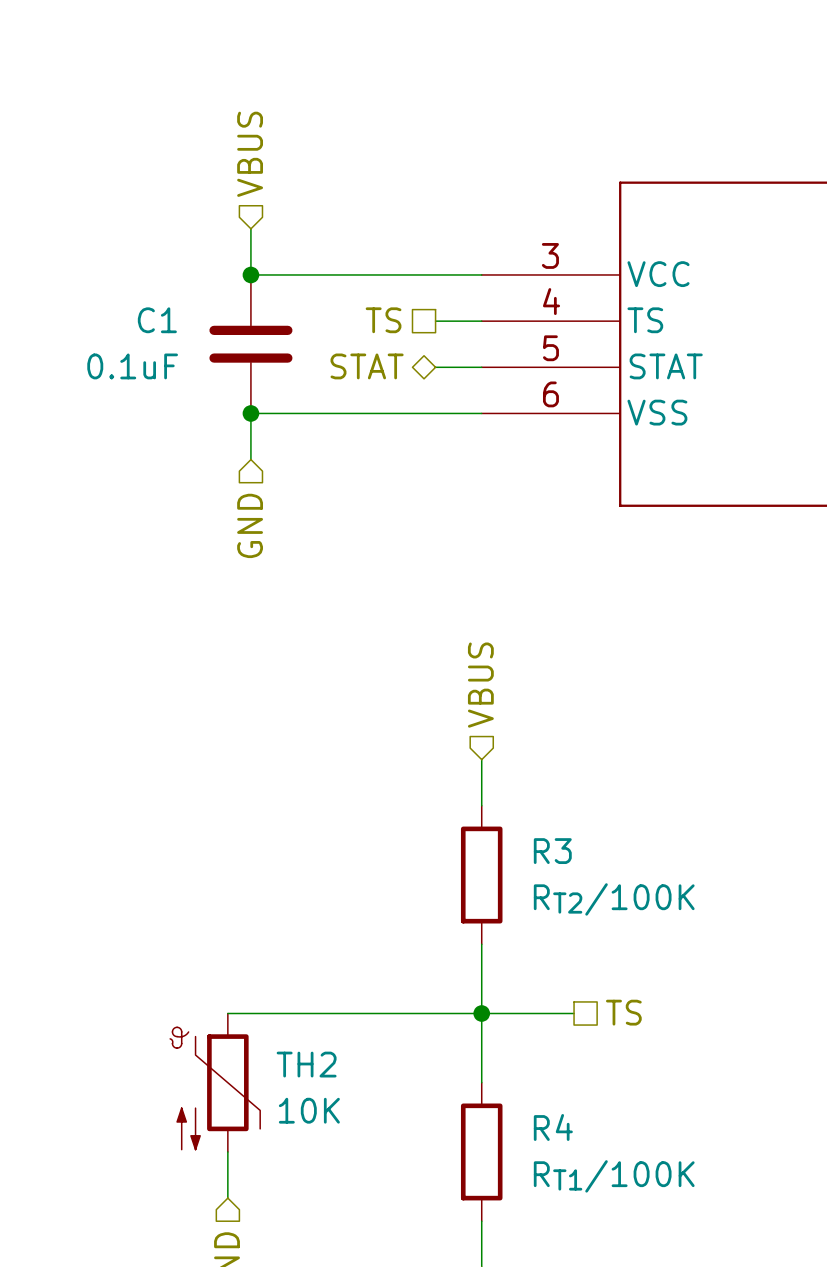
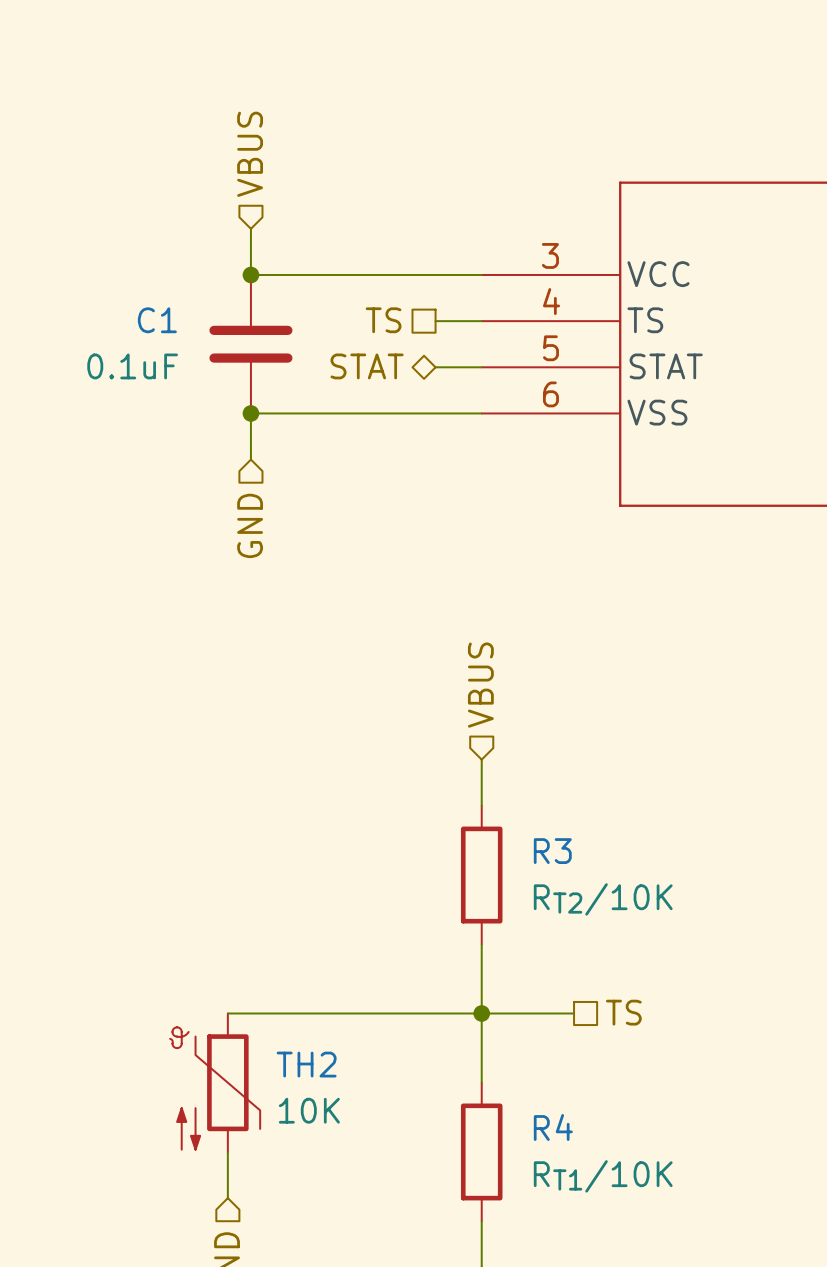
R3 value: RT2/100K (614, 899) -> RT2/10K (603, 899)
R4 value: RT1/100K (614, 1176) -> RT1/10K (603, 1176)

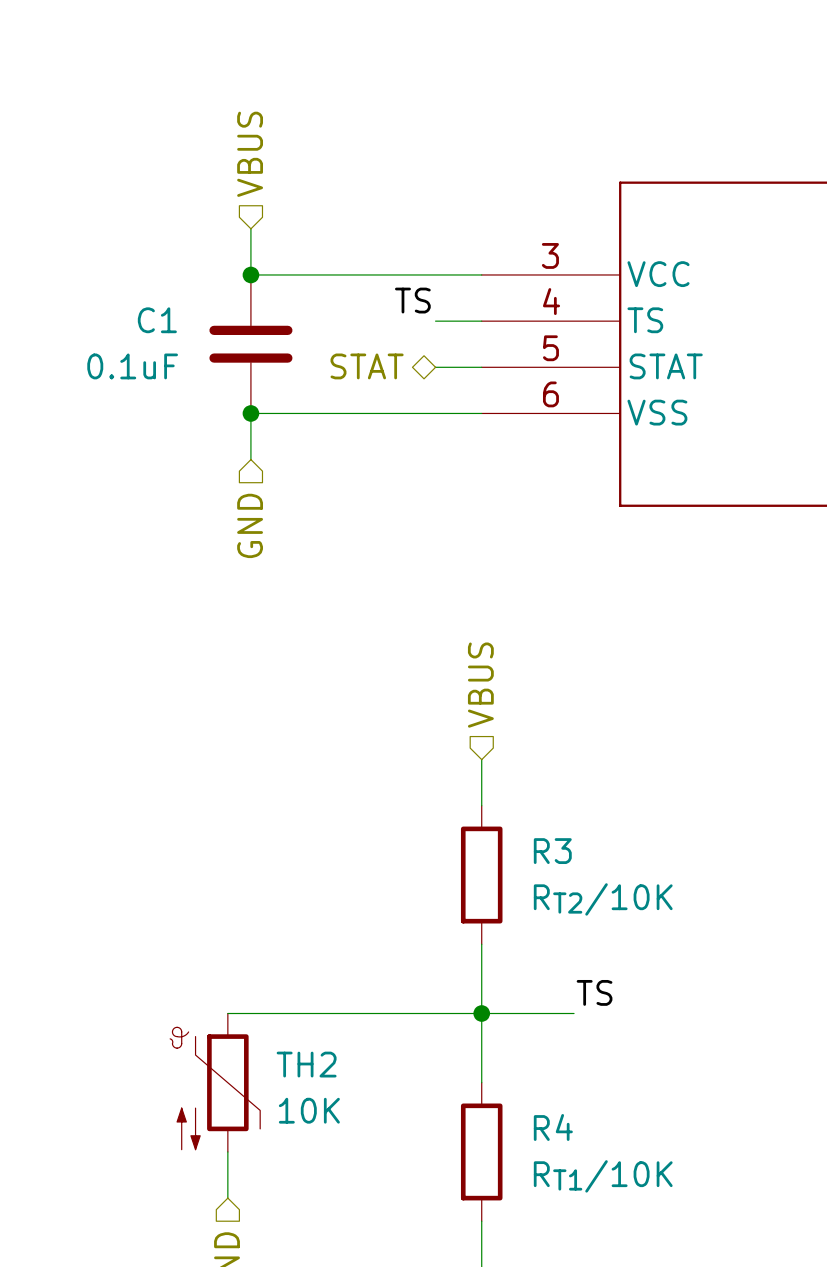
label: none -> TS (412, 300)
hierarchical label: TS (383, 320) -> none
label: none -> TS (594, 992)
hierarchical label: TS (623, 1012) -> none

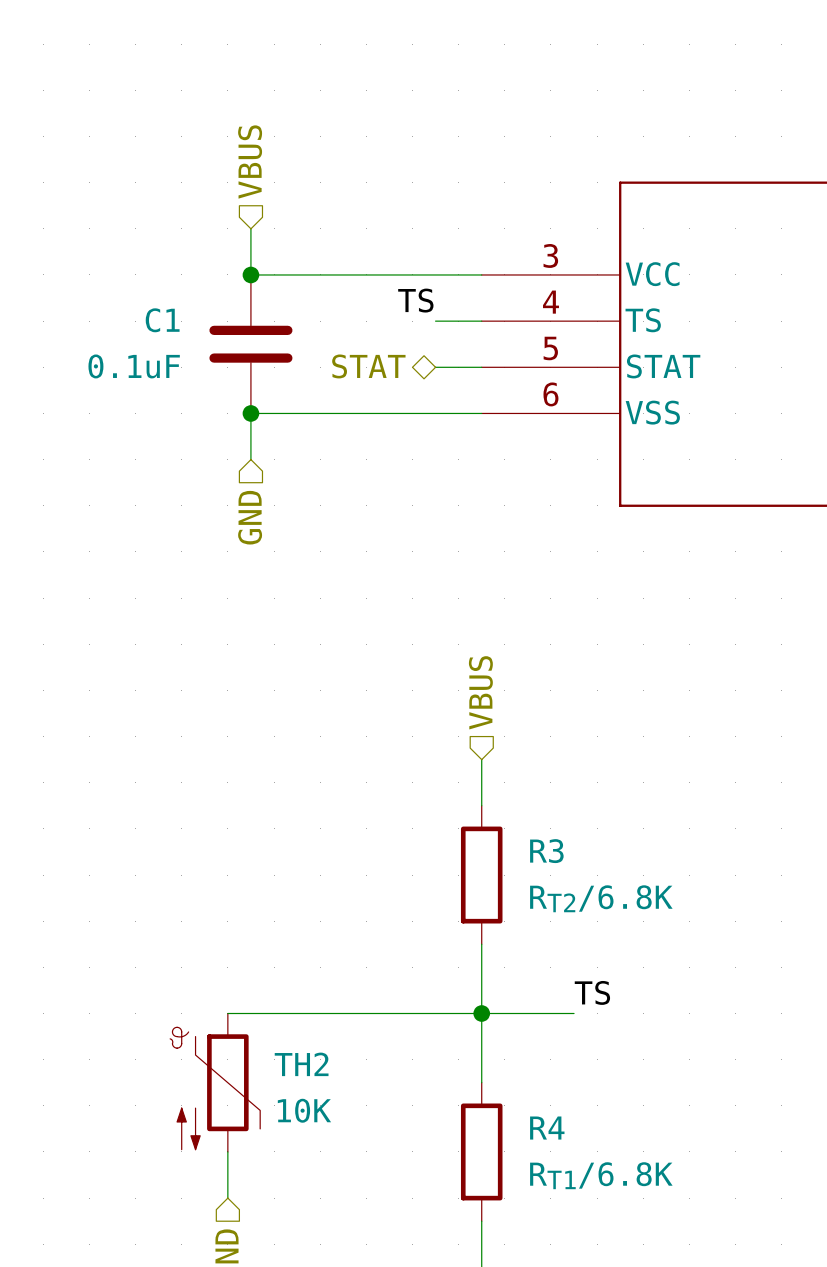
R3 value: RT2/10K (603, 899) -> RT2/6.8K (601, 898)
R4 value: RT1/10K (603, 1176) -> RT1/6.8K (601, 1175)

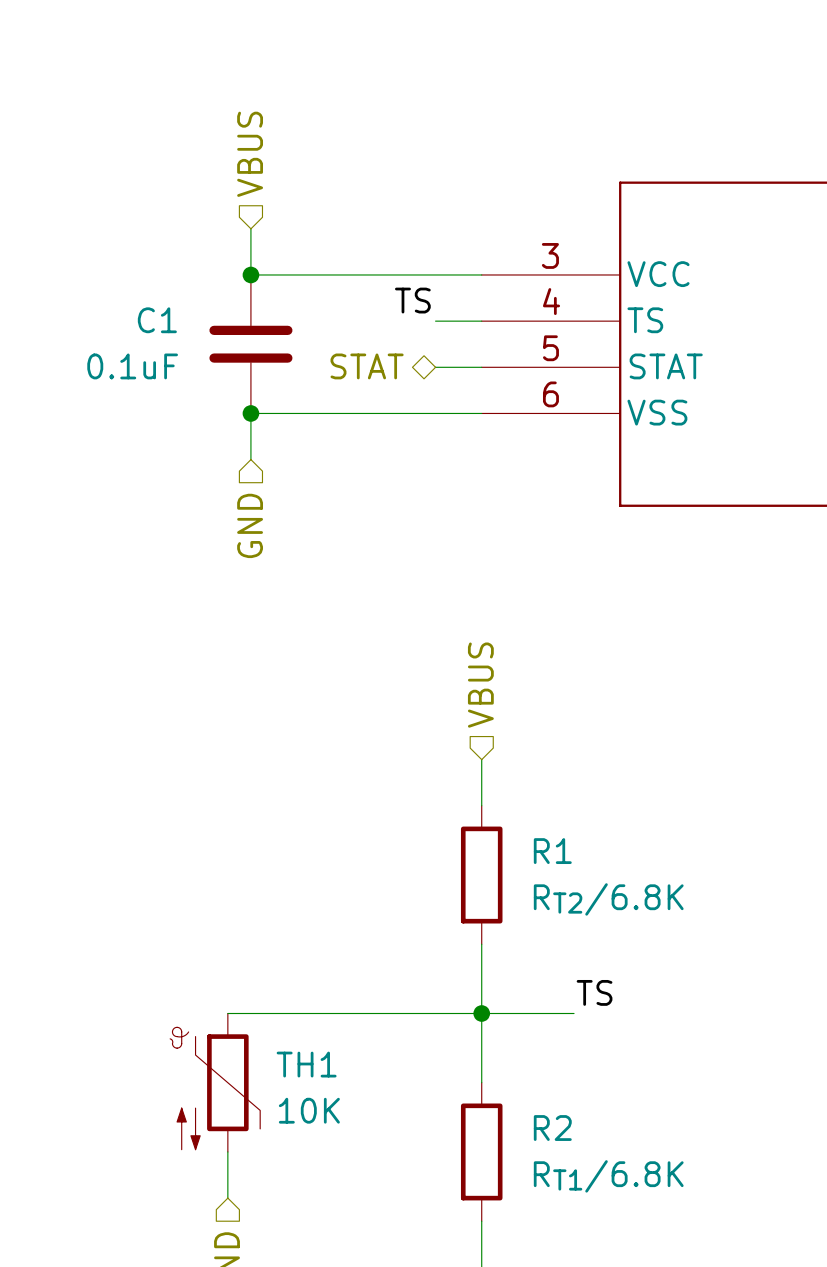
R3 name: R3 (546, 851) -> R1 (552, 851)
TH2 name: TH2 (301, 1064) -> TH1 (306, 1064)
R4 name: R4 (547, 1128) -> R2 (552, 1128)

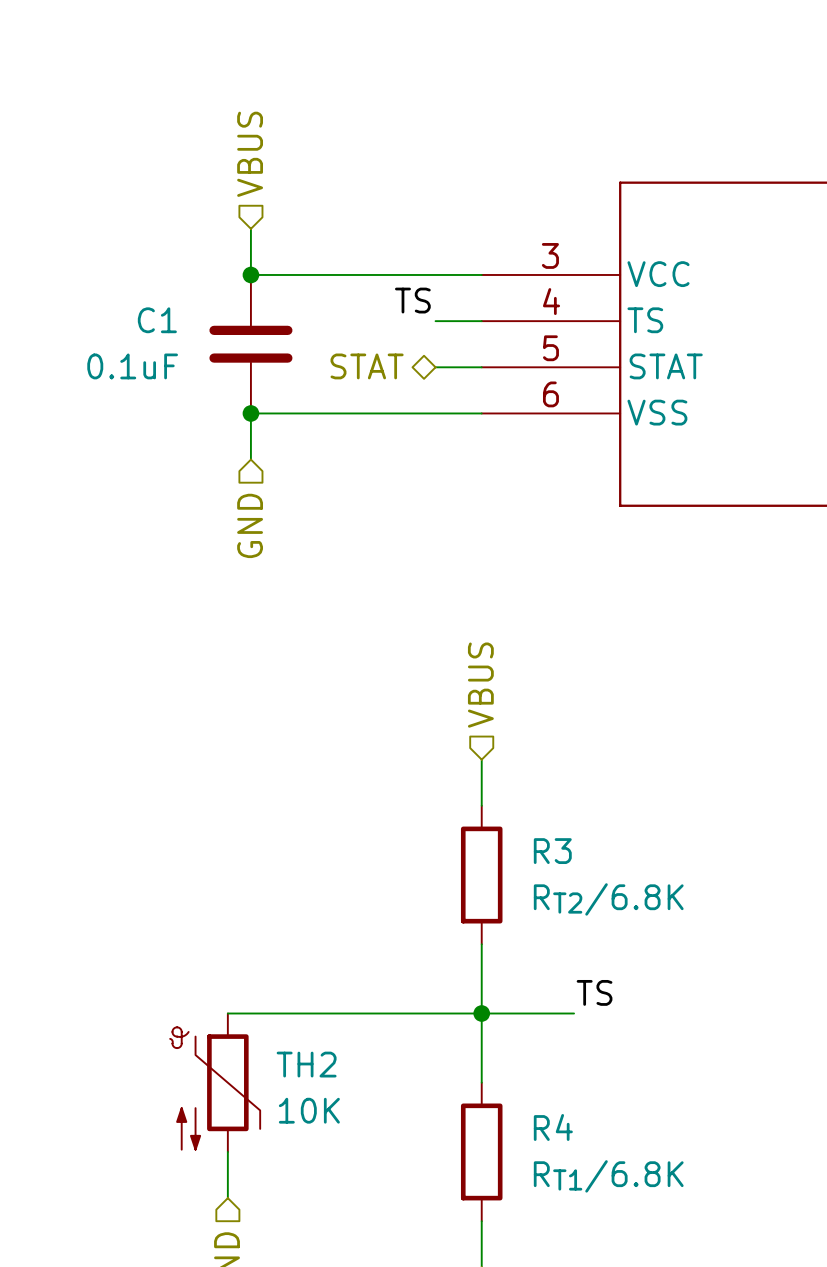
R1 name: R1 (552, 851) -> R3 (552, 851)
TH1 name: TH1 (306, 1064) -> TH2 (306, 1064)
R2 name: R2 (552, 1128) -> R4 (553, 1127)

